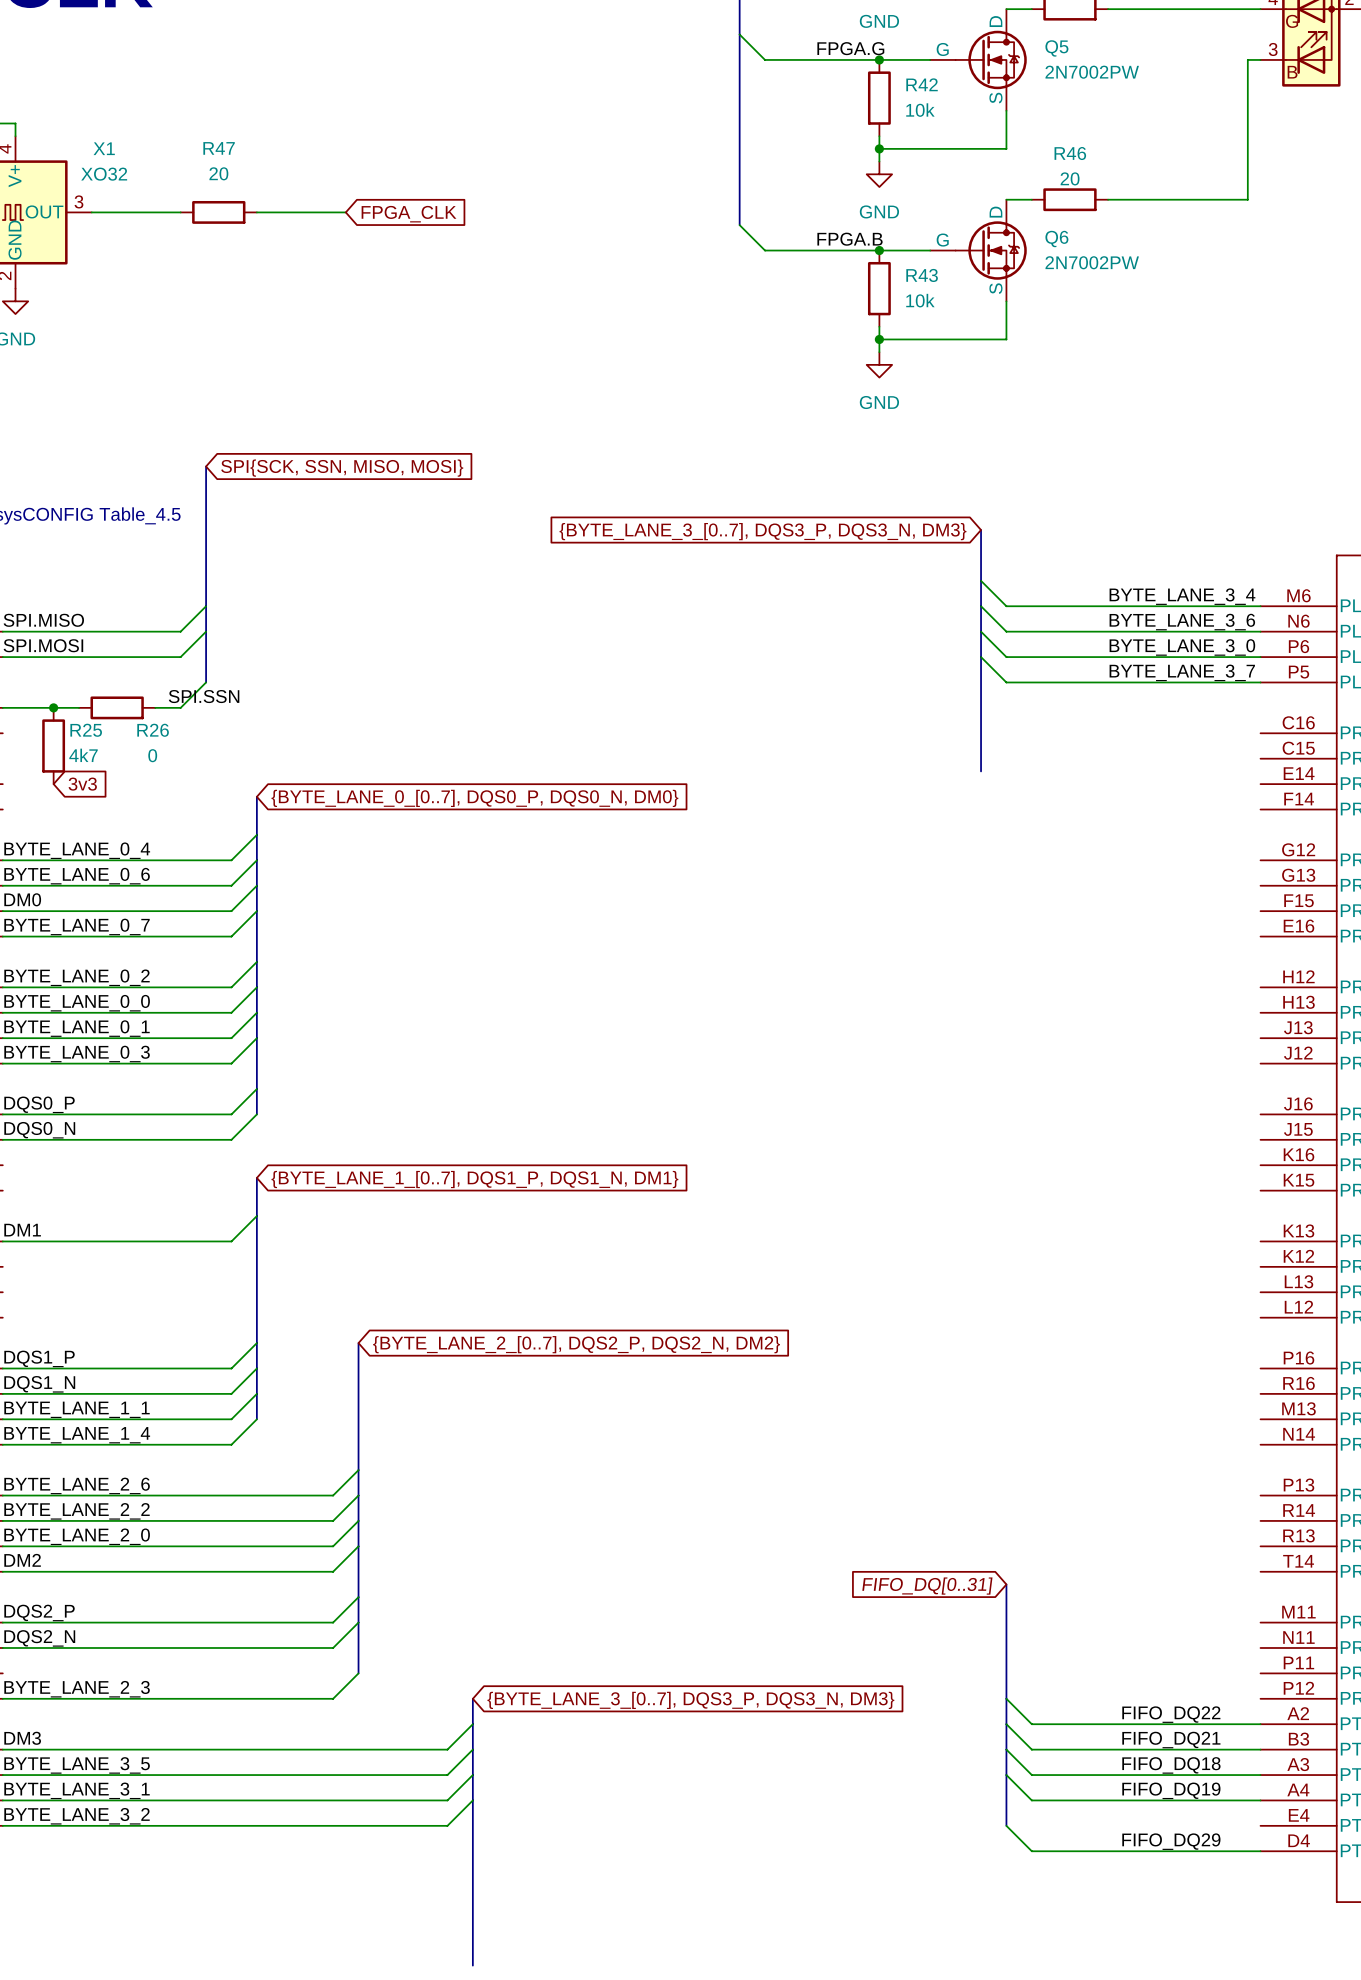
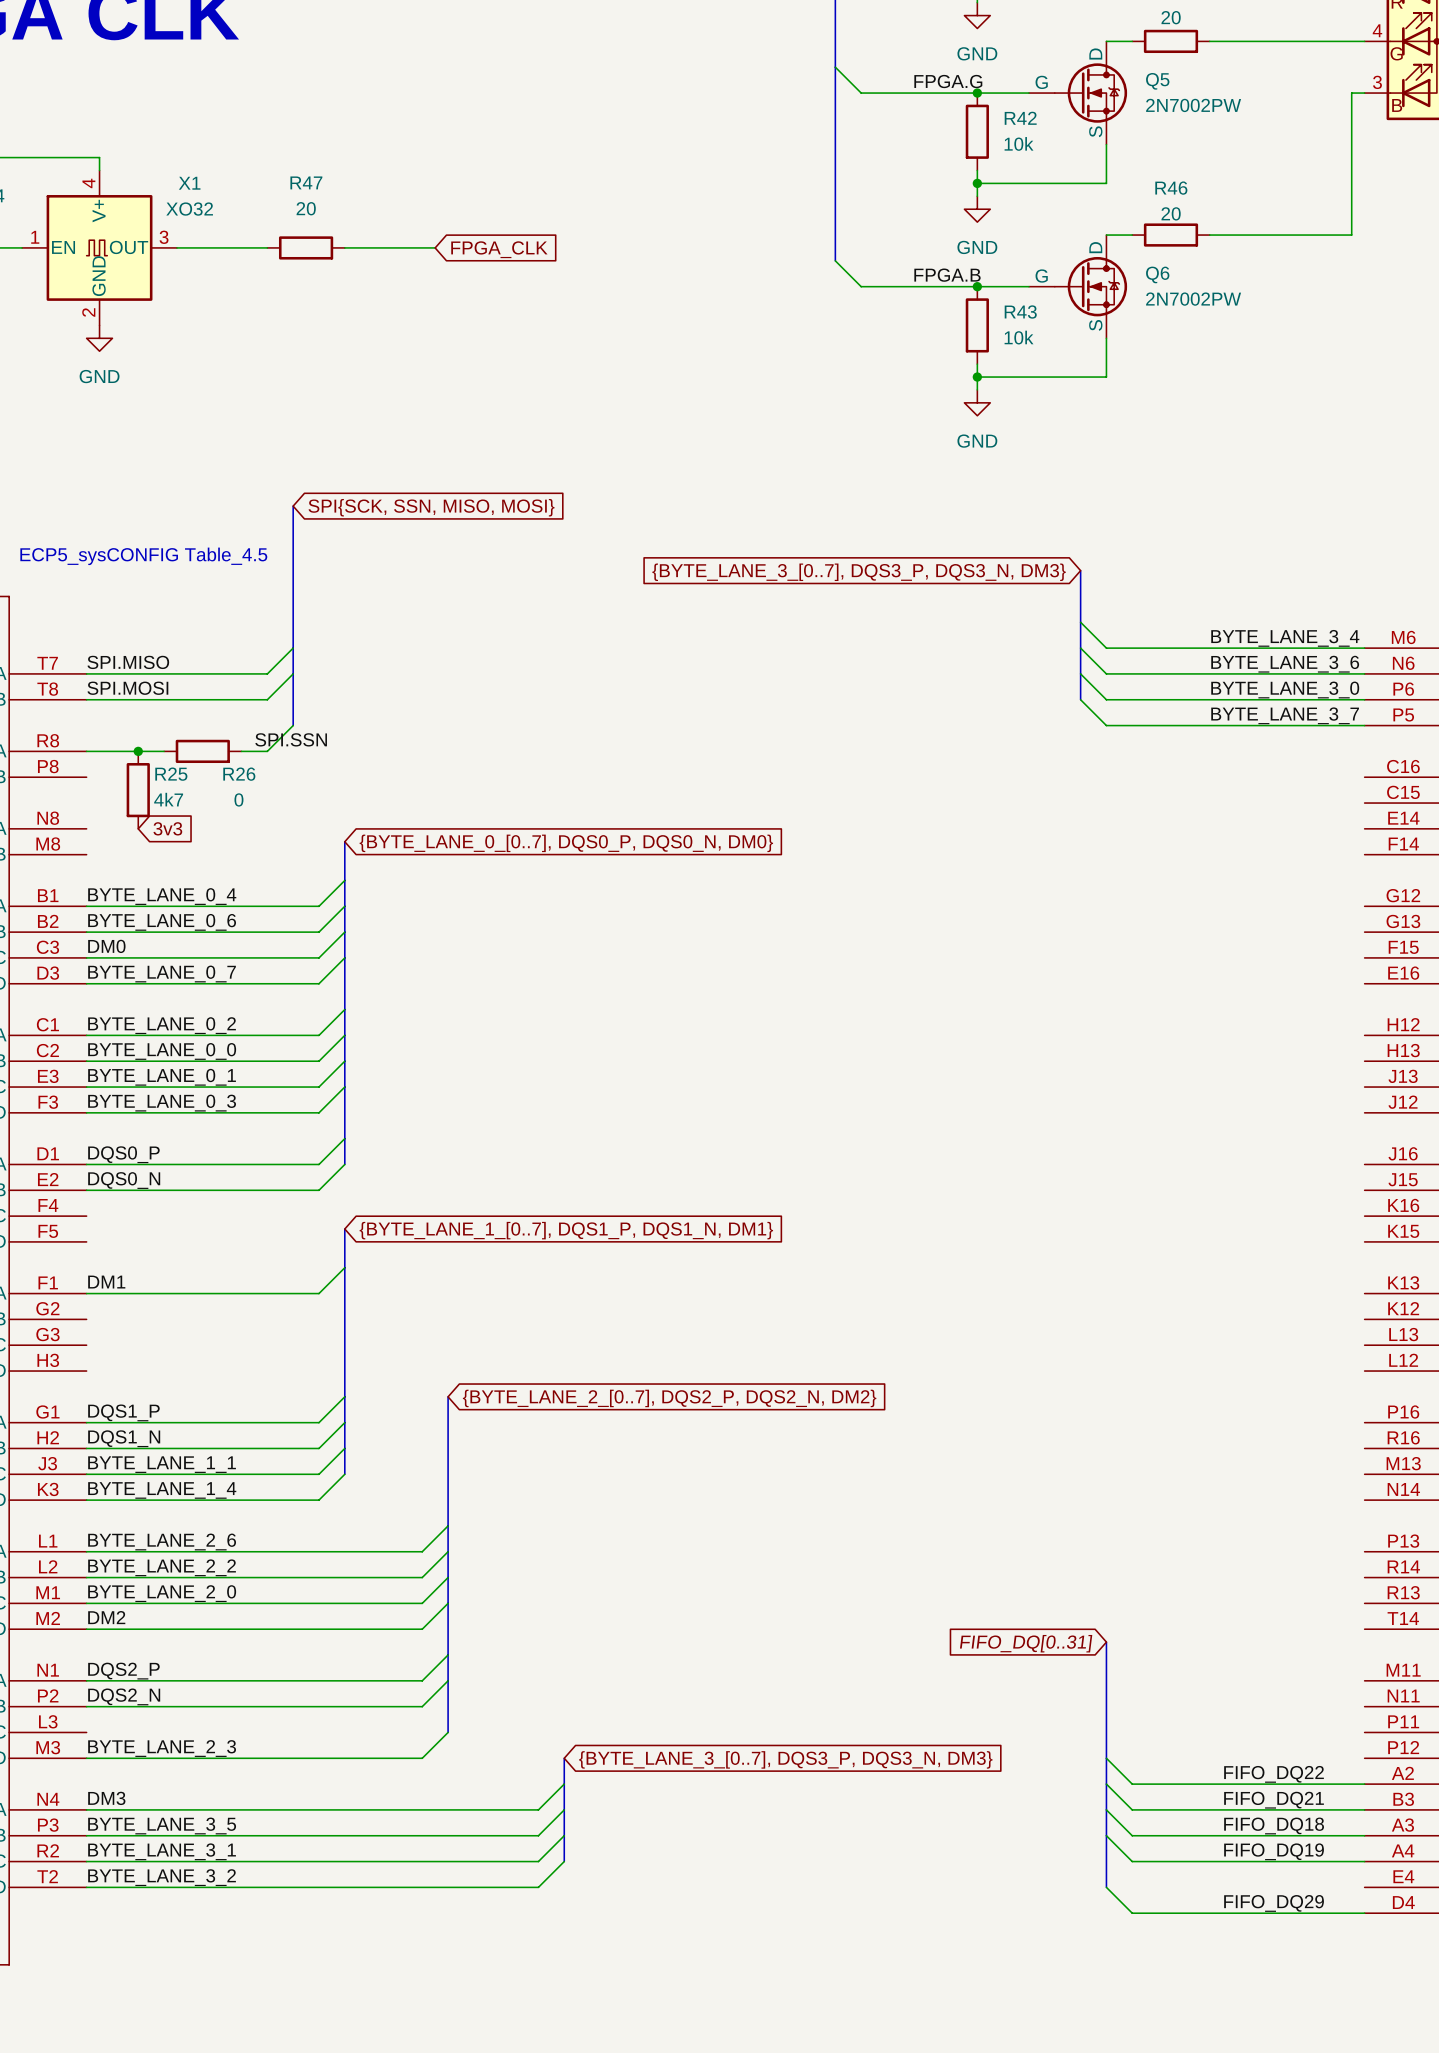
bus: (981, 657) (981, 771) -> none
bus: (472, 1800) (472, 1965) -> none

